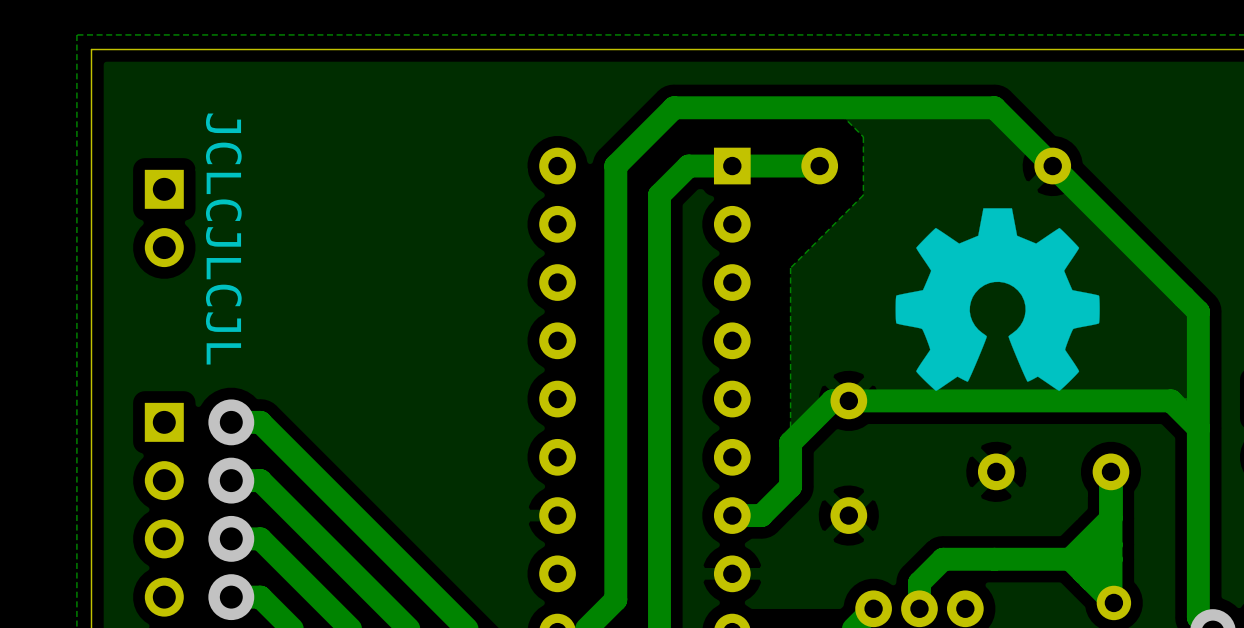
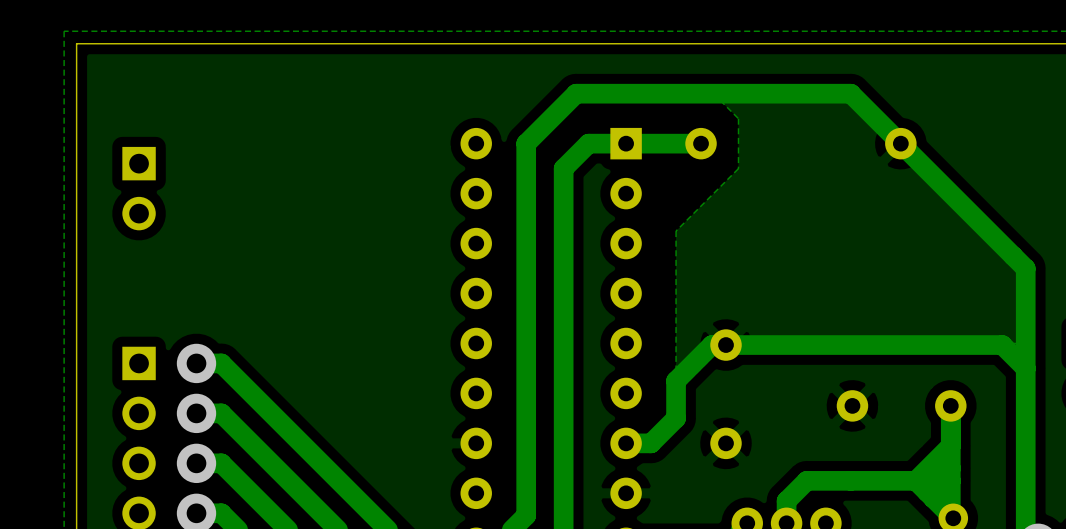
drawing: [895, 208, 1100, 391] -> none
text: JCLCJLCJL (223, 239) -> none

